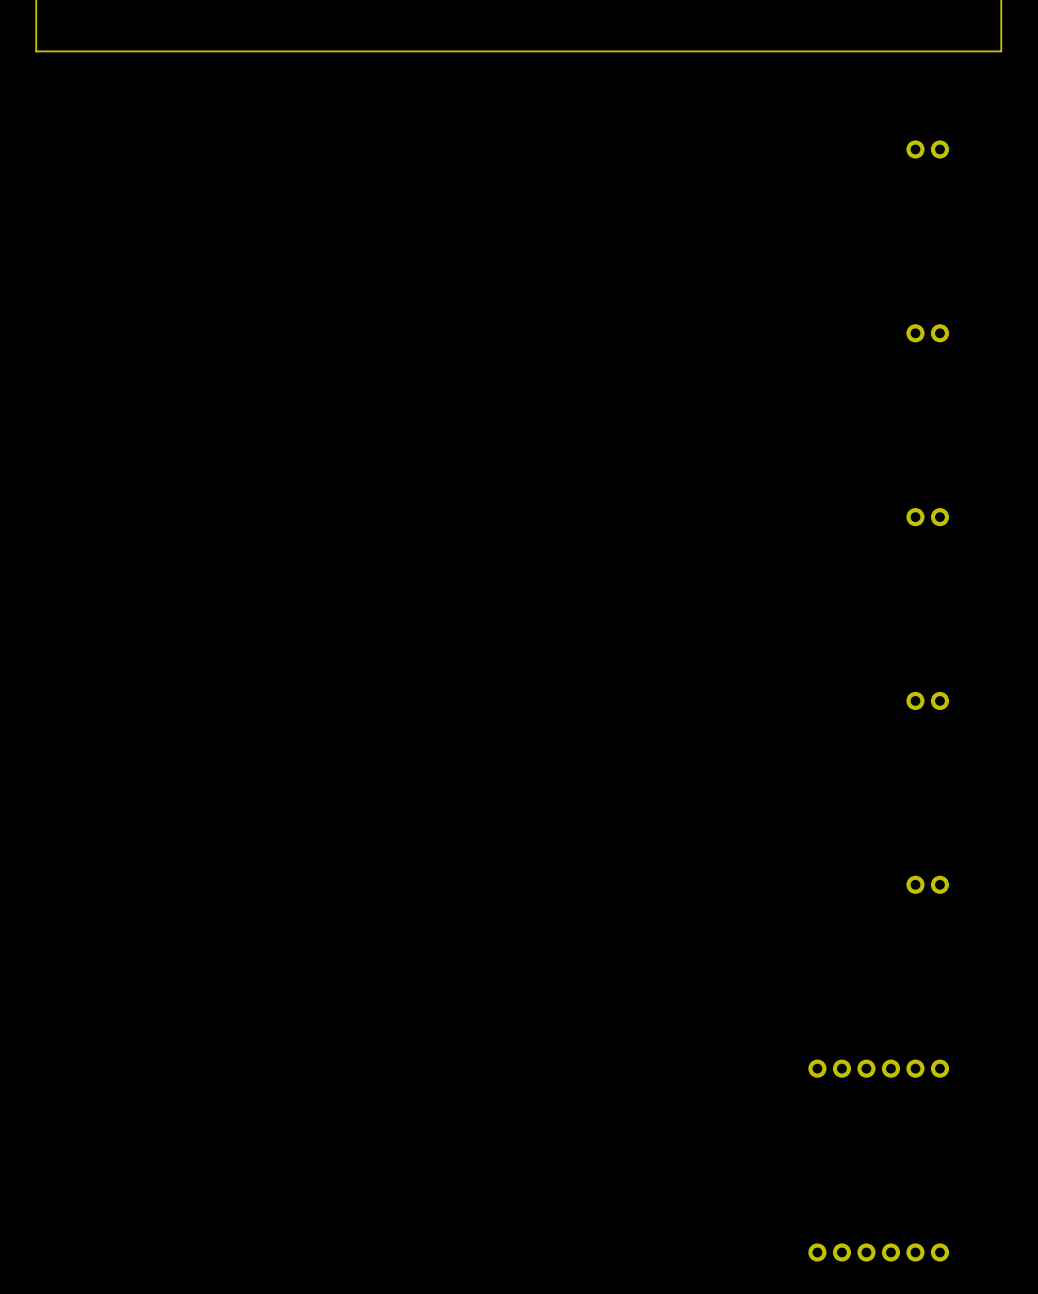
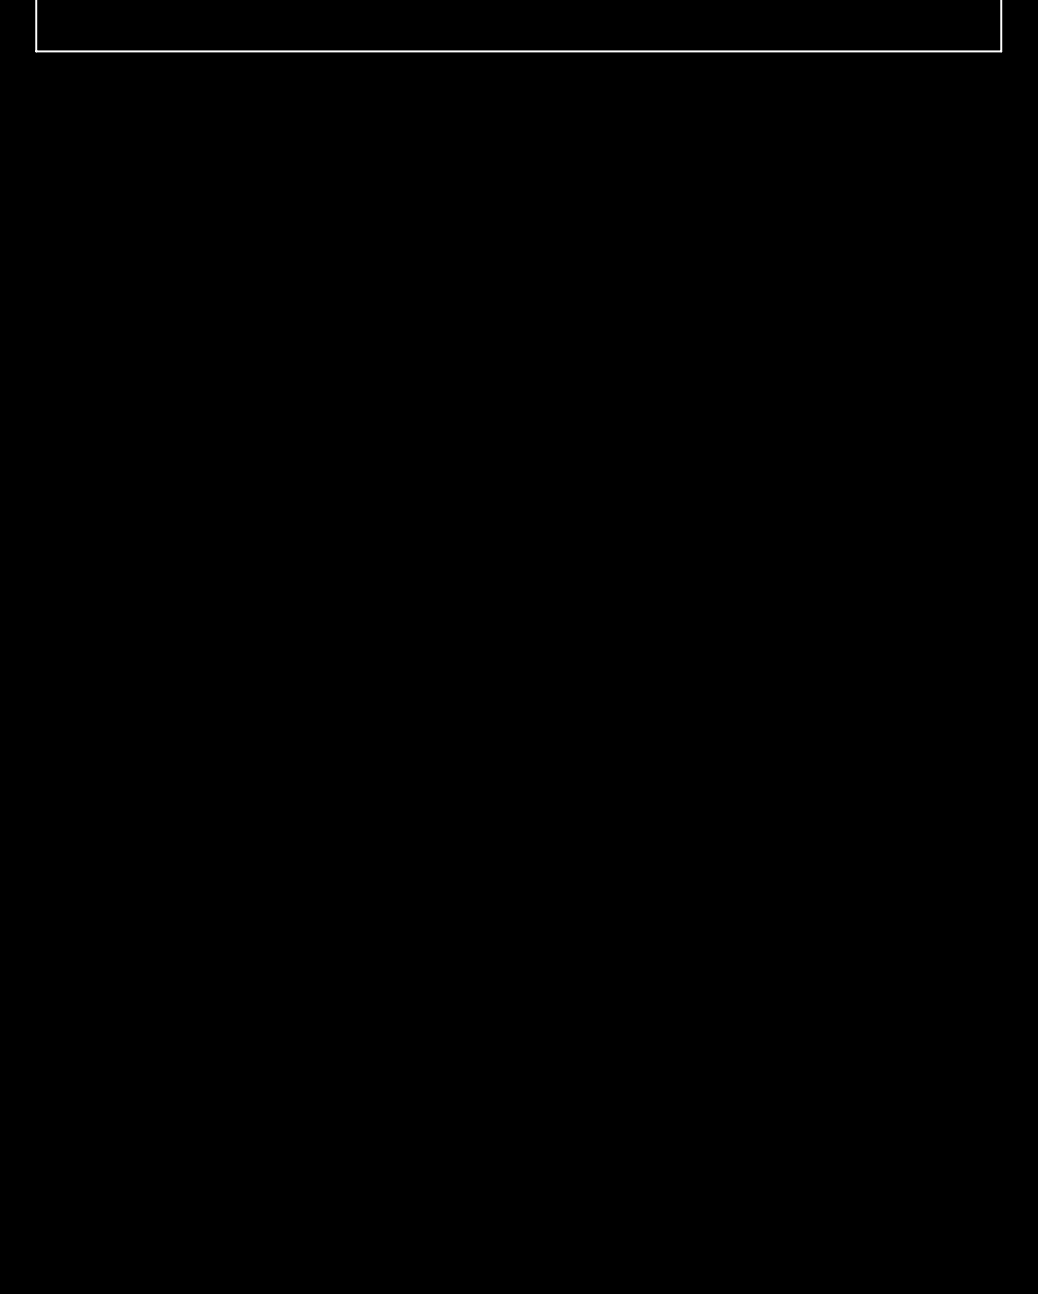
part: (927, 149) -> none
part: (927, 333) -> none
part: (927, 517) -> none
part: (927, 700) -> none
part: (927, 884) -> none
part: (878, 1068) -> none
part: (878, 1252) -> none

